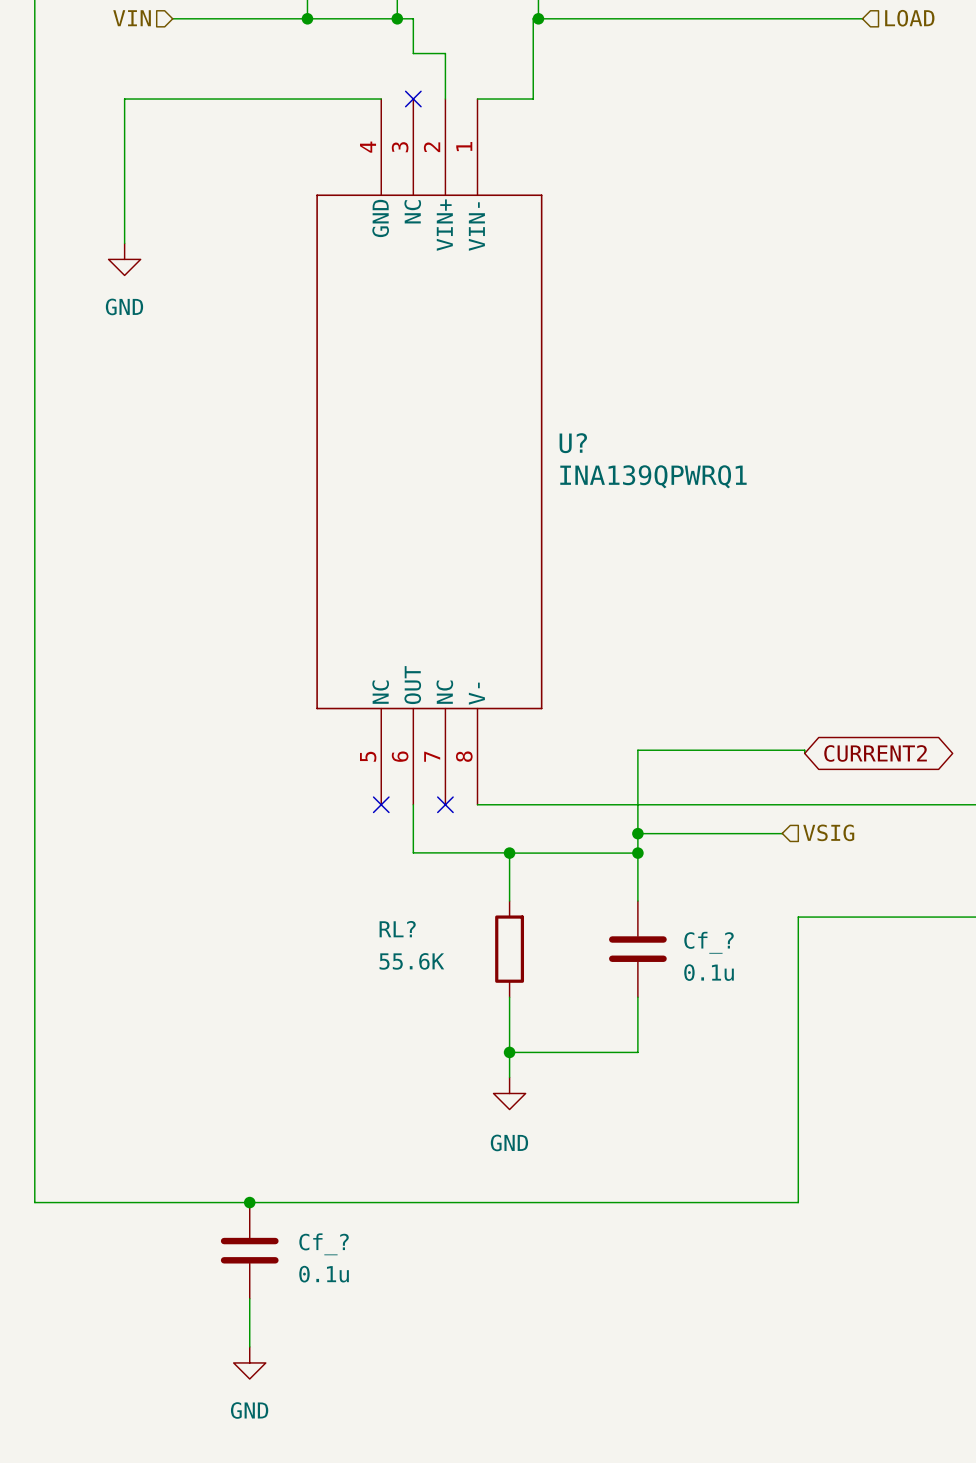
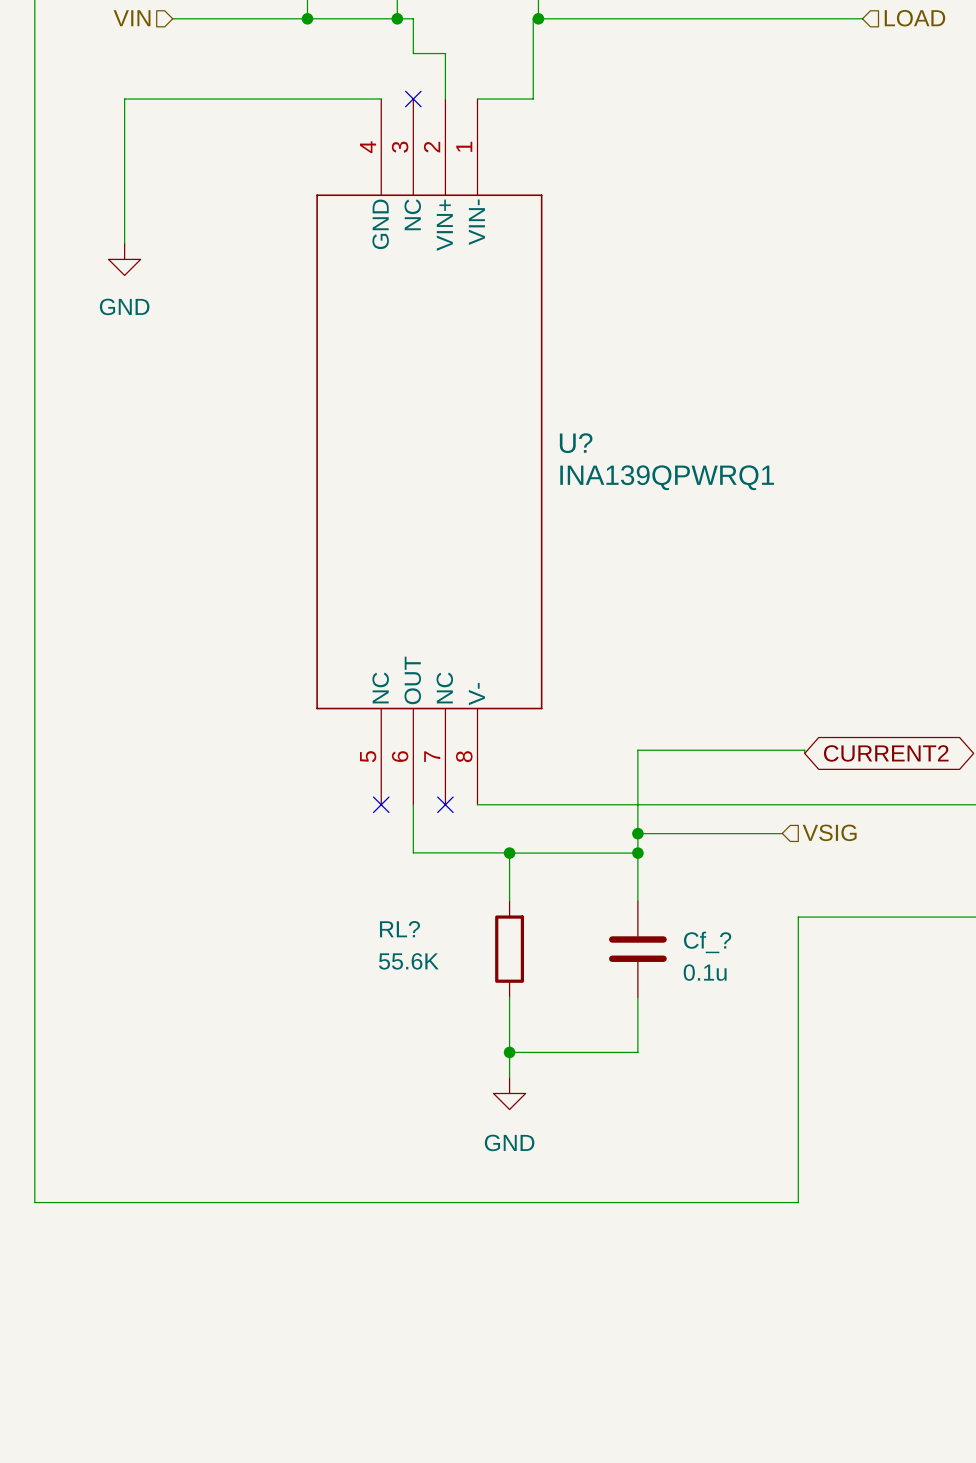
junction: (249, 1202) -> none
Cf_?: 0.1u (249, 1250) -> none
wire: (249, 1298) (249, 1346) -> none
power symbol: GND (249, 1362) -> none

